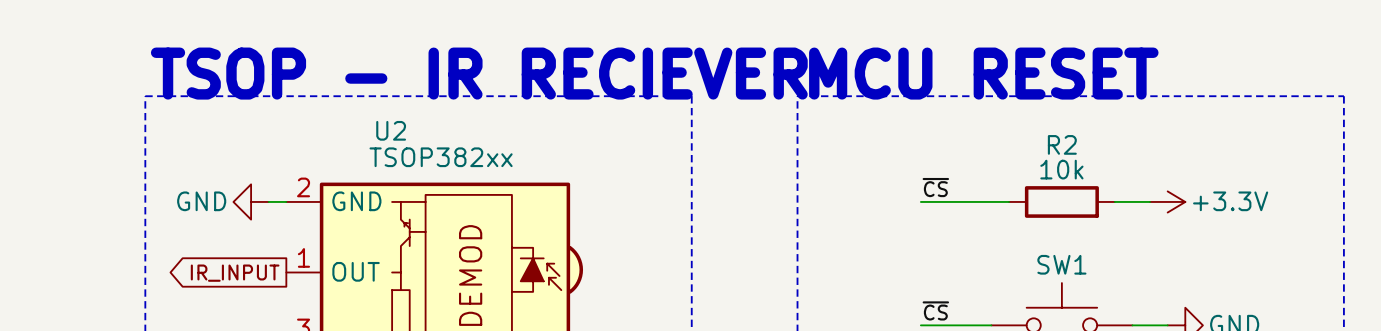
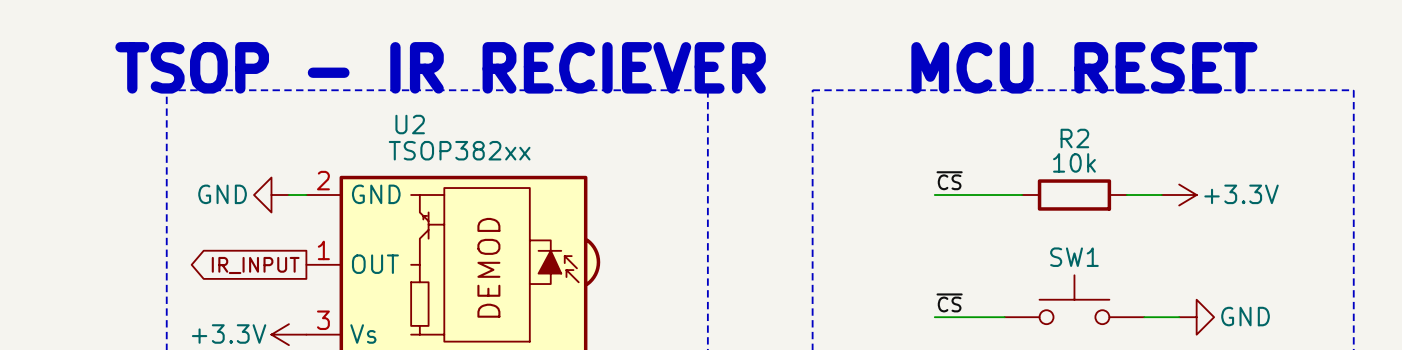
text position: TSOP - IR RECIEVER (479, 73) -> TSOP - IR RECIEVER (440, 67)
text position: MCU RESET (983, 73) -> MCU RESET (1084, 67)

